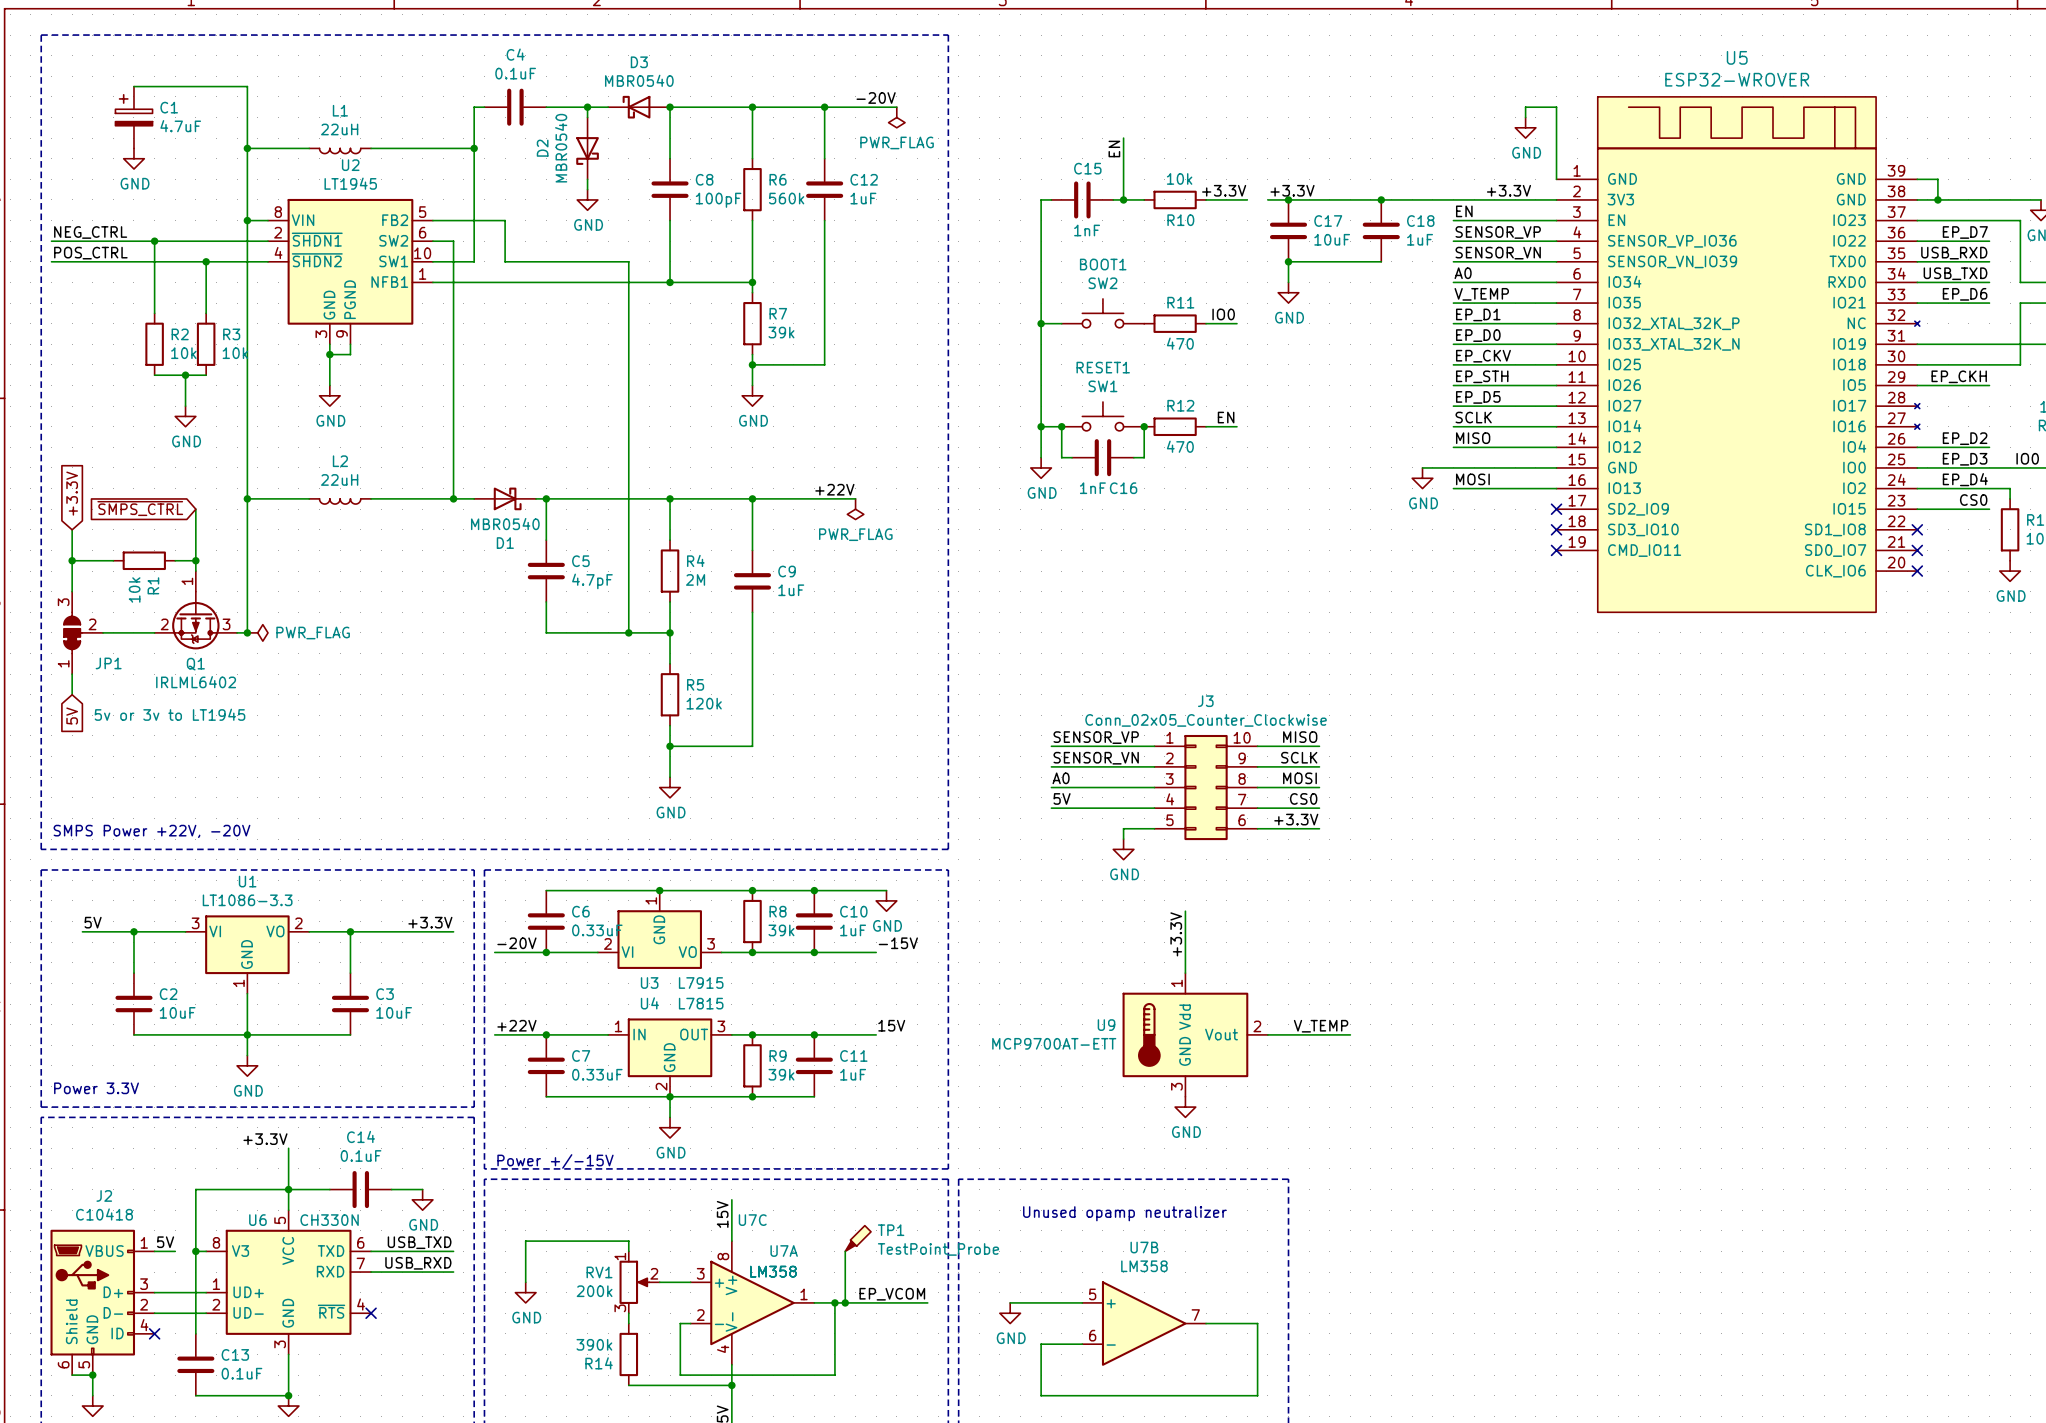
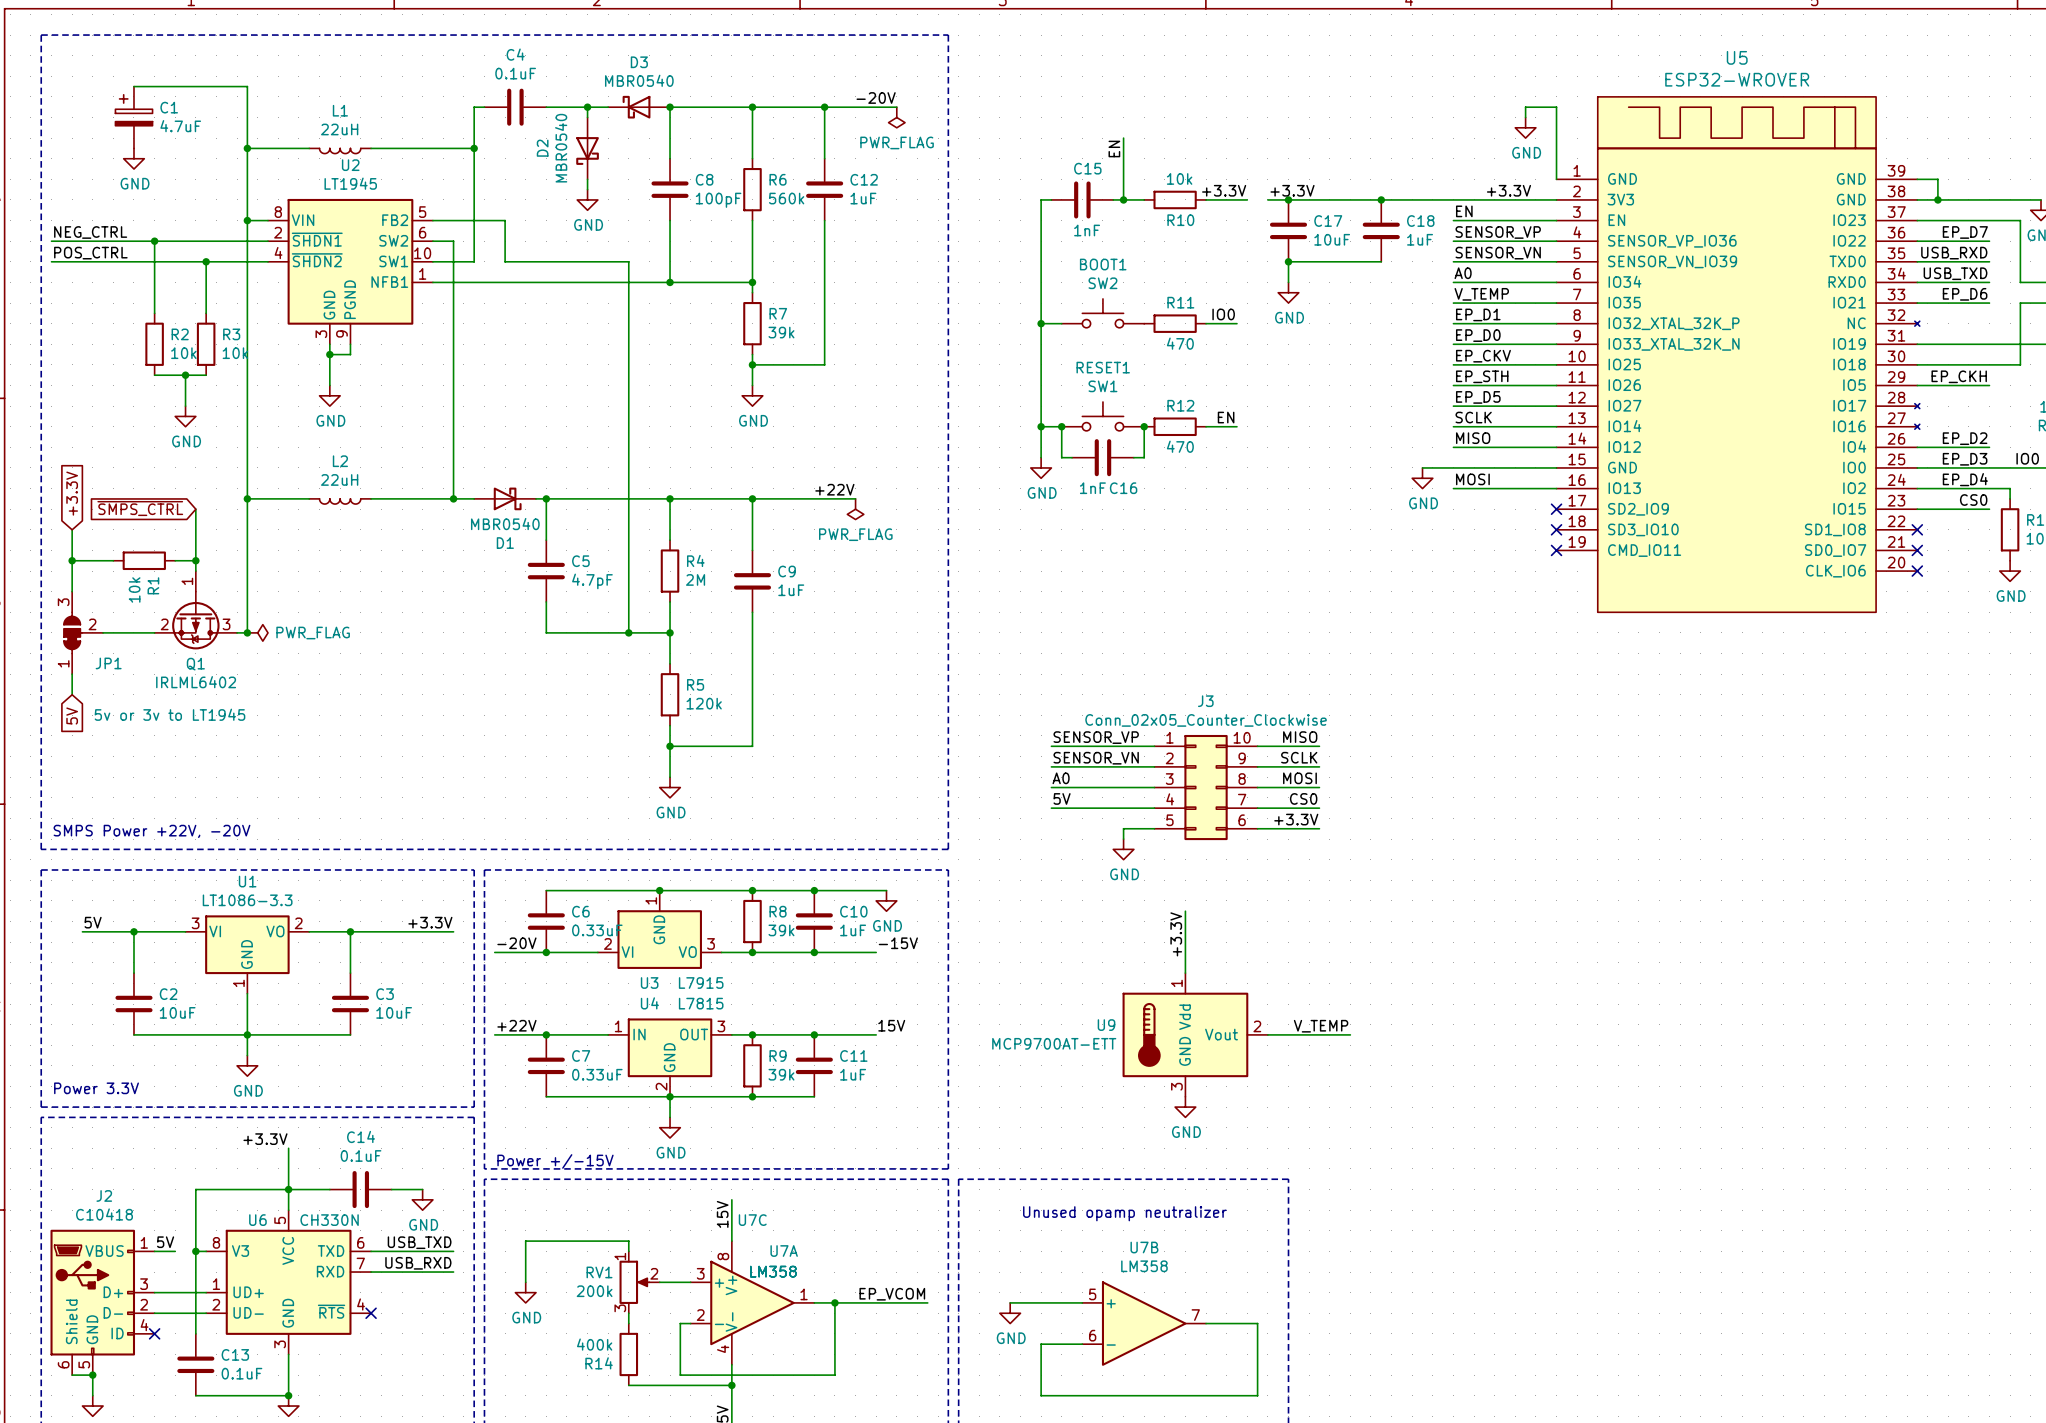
TP1: TestPoint_Probe (858, 1238) -> none
wire: (845, 1251) (845, 1302) -> none
junction: (845, 1302) -> none
R14 value: 390k (594, 1344) -> 400k (594, 1344)

